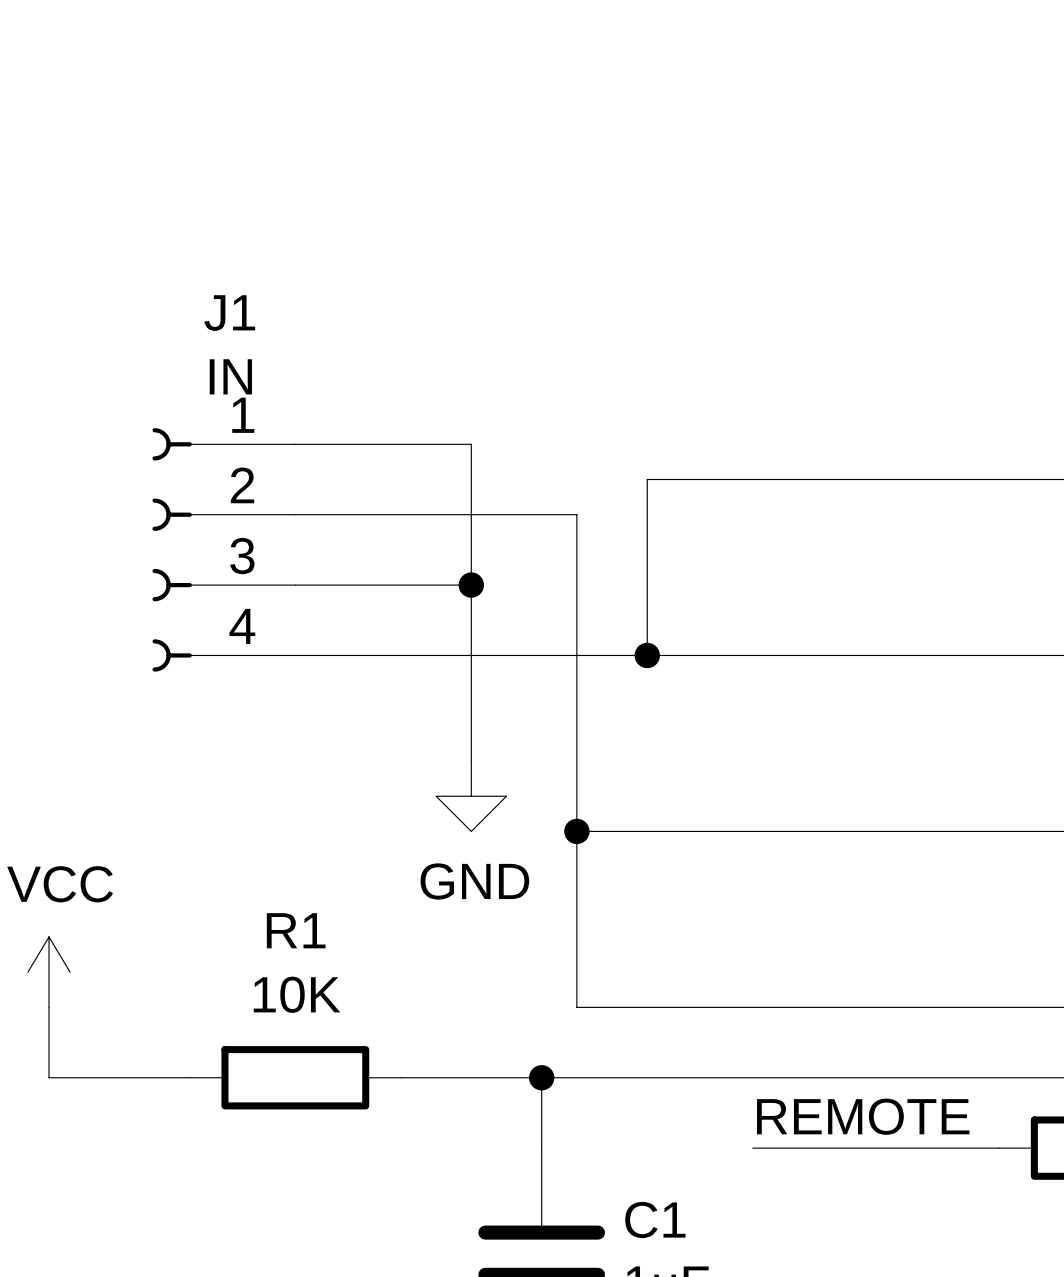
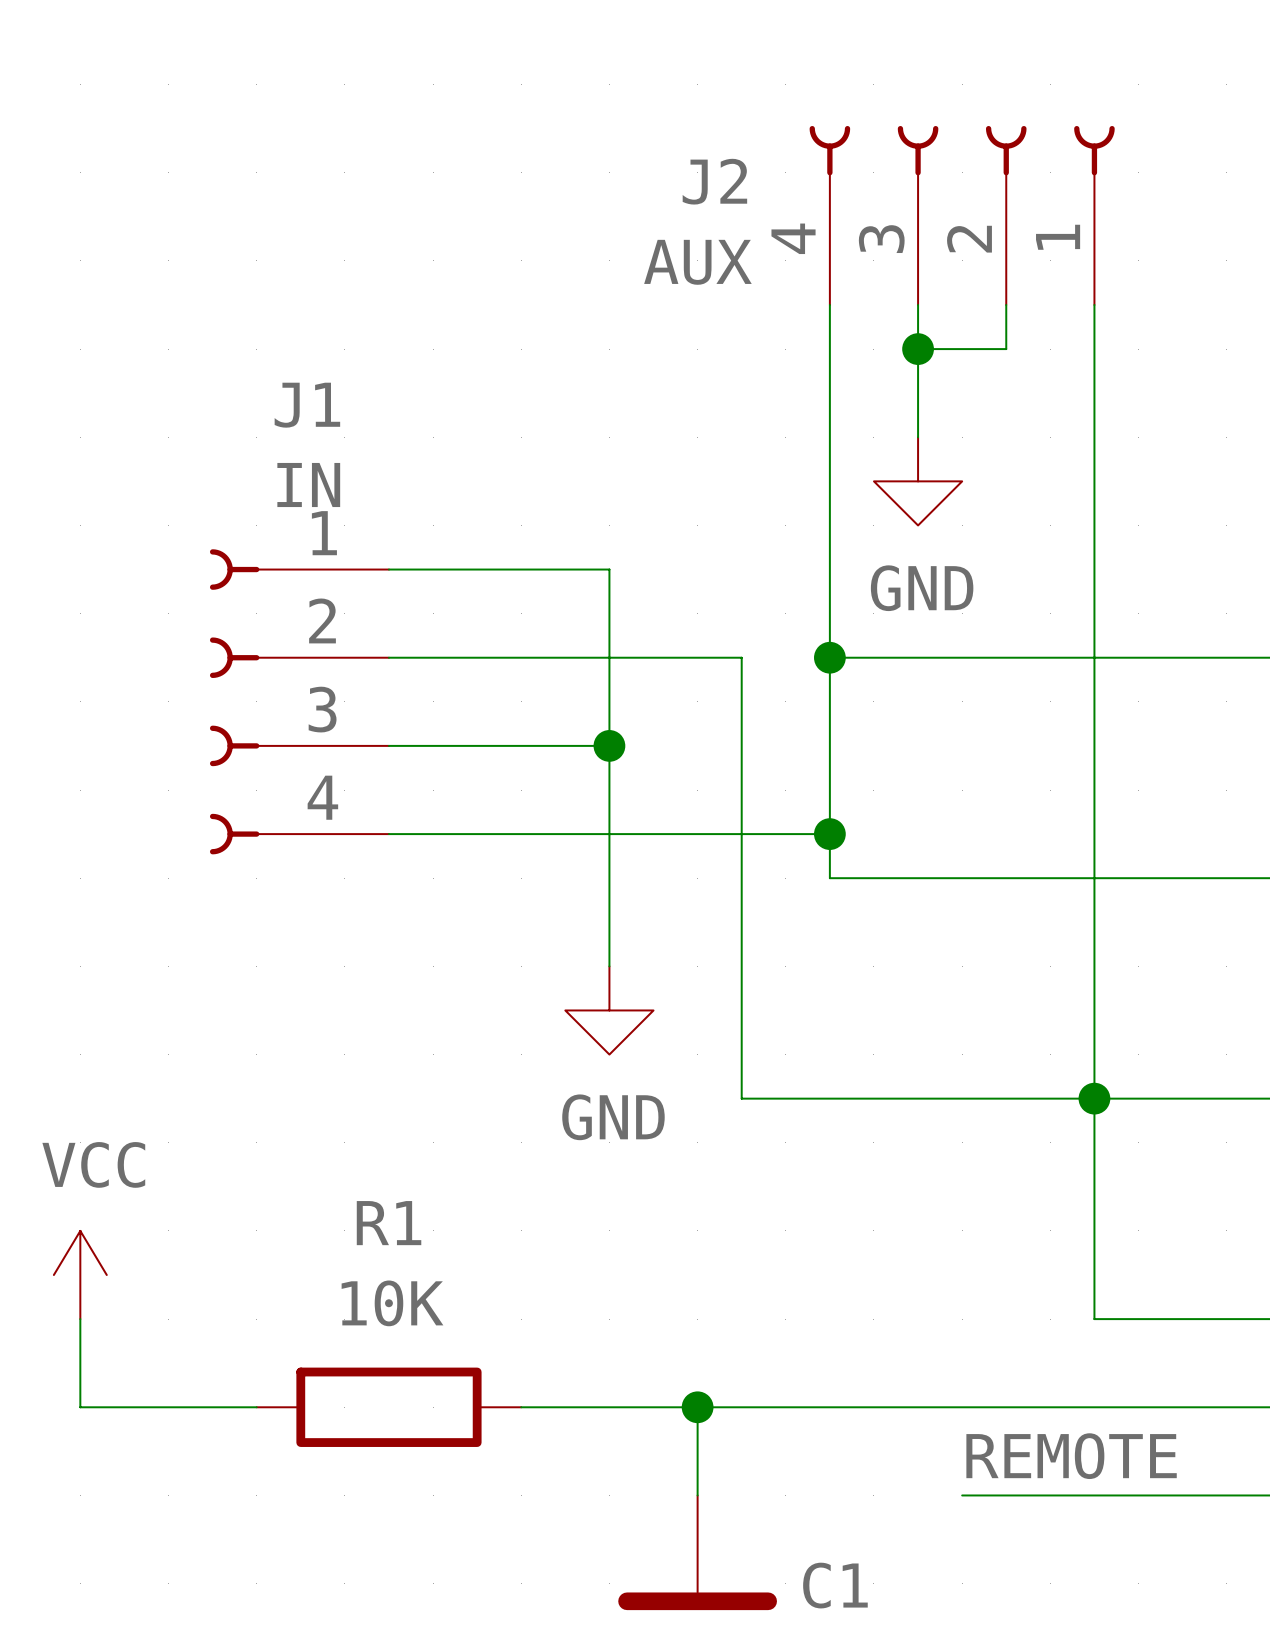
J2: none -> AUX (962, 215)
wire: none -> (829, 304) (829, 657)
wire: none -> (918, 304) (918, 437)
wire: none -> (1006, 304) (1006, 349) (918, 349)
junction: none -> (918, 349)
power symbol: none -> GND (918, 481)
wire: (295, 444) (471, 444) -> (388, 569) (609, 569) (609, 613)
junction: none -> (829, 657)
wire: (295, 514) (576, 514) -> (388, 657) (741, 657) (741, 701)
J1 position: (223, 549) -> (299, 701)
wire: (295, 585) (471, 585) -> (388, 745) (609, 745)
junction position: (471, 585) -> (609, 745)
wire: (295, 655) (647, 655) -> (388, 834) (829, 834)
junction position: (647, 655) -> (829, 834)
power symbol position: GND (471, 796) -> GND (609, 1010)
wire: (576, 831) (576, 1007) (858, 1007) -> (1094, 304) (1094, 1319)
junction: (576, 831) -> none
junction: none -> (1094, 1098)

